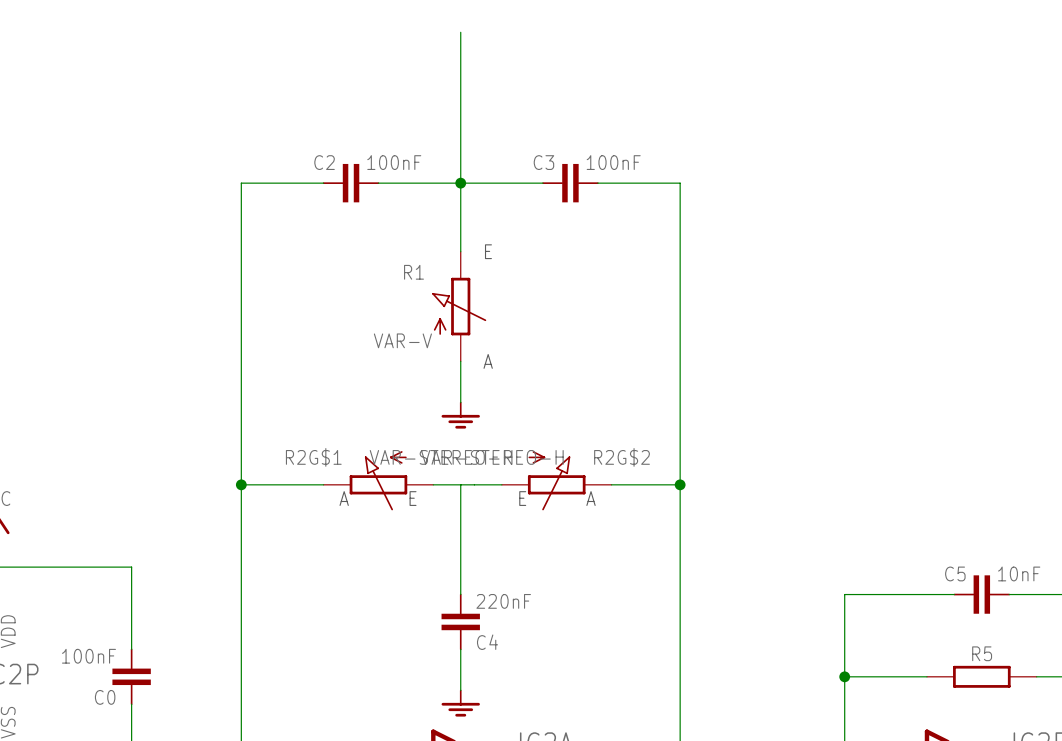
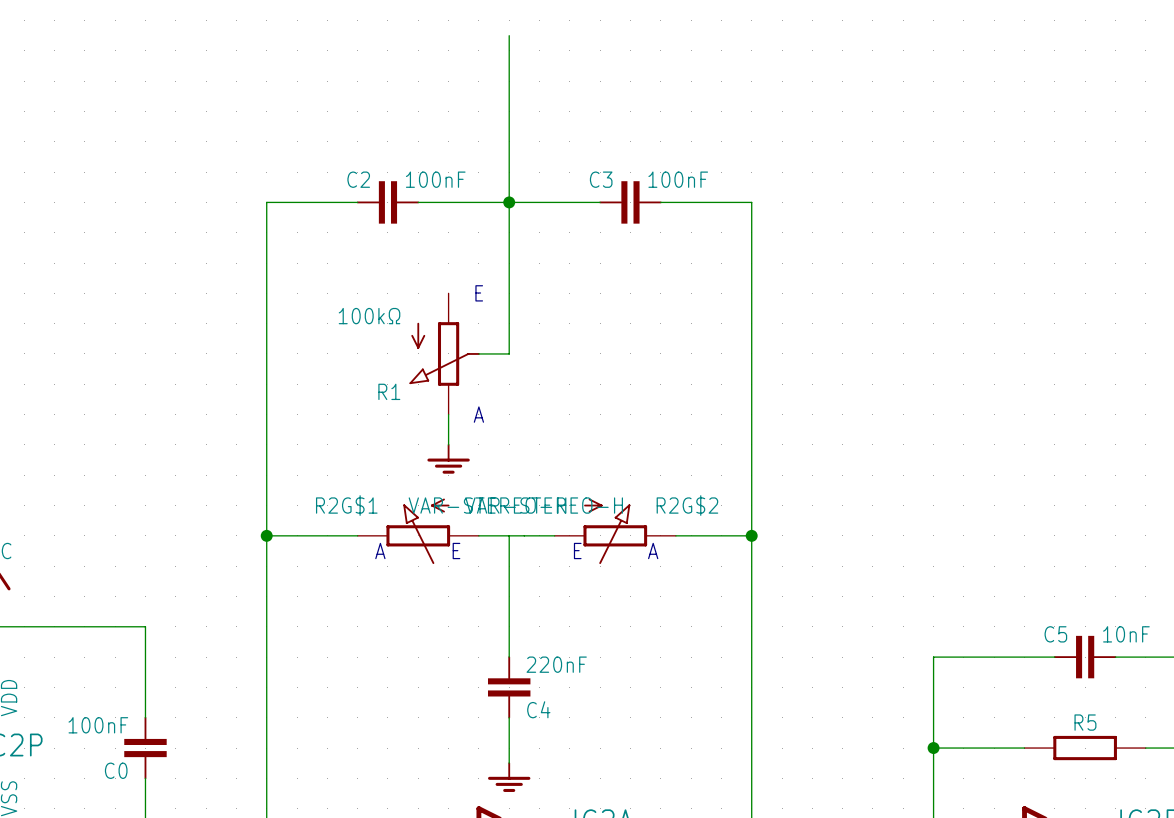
R1 symbol: [432, 251, 487, 362] -> [409, 293, 480, 415]
wire: none -> (509, 278) (509, 353) (478, 353)
R1 name position: R1 (413, 272) -> R1 (389, 391)
R1 value: VAR-V (402, 340) -> 100kΩ (369, 316)
wire: (460, 361) (460, 402) -> none
wire: none -> (448, 414) (448, 444)
power symbol position: (460, 415) -> (448, 458)

